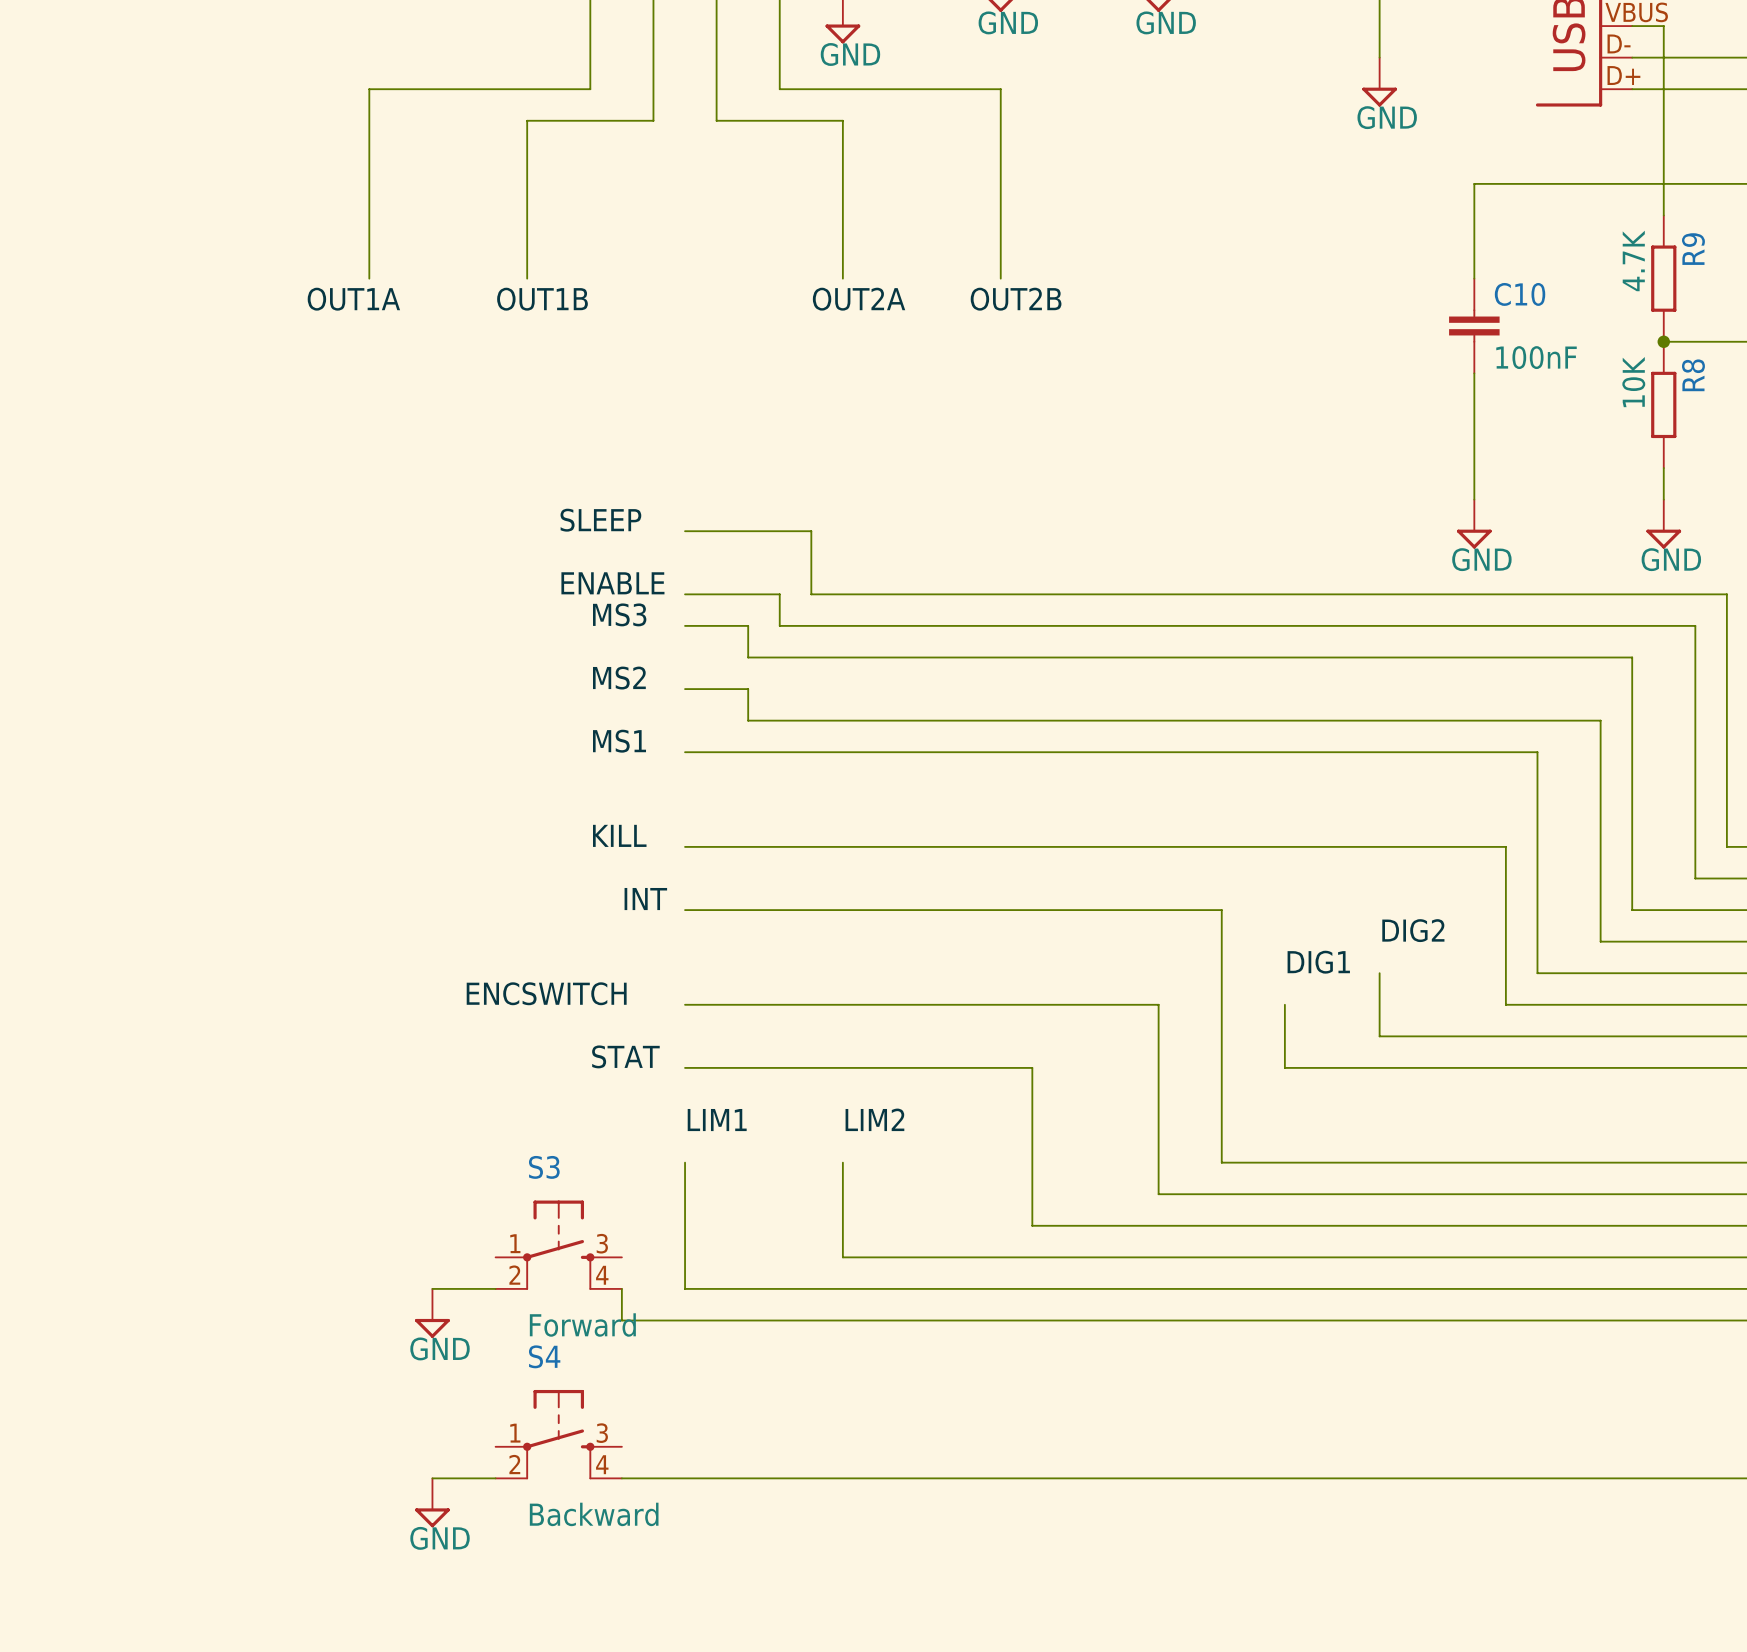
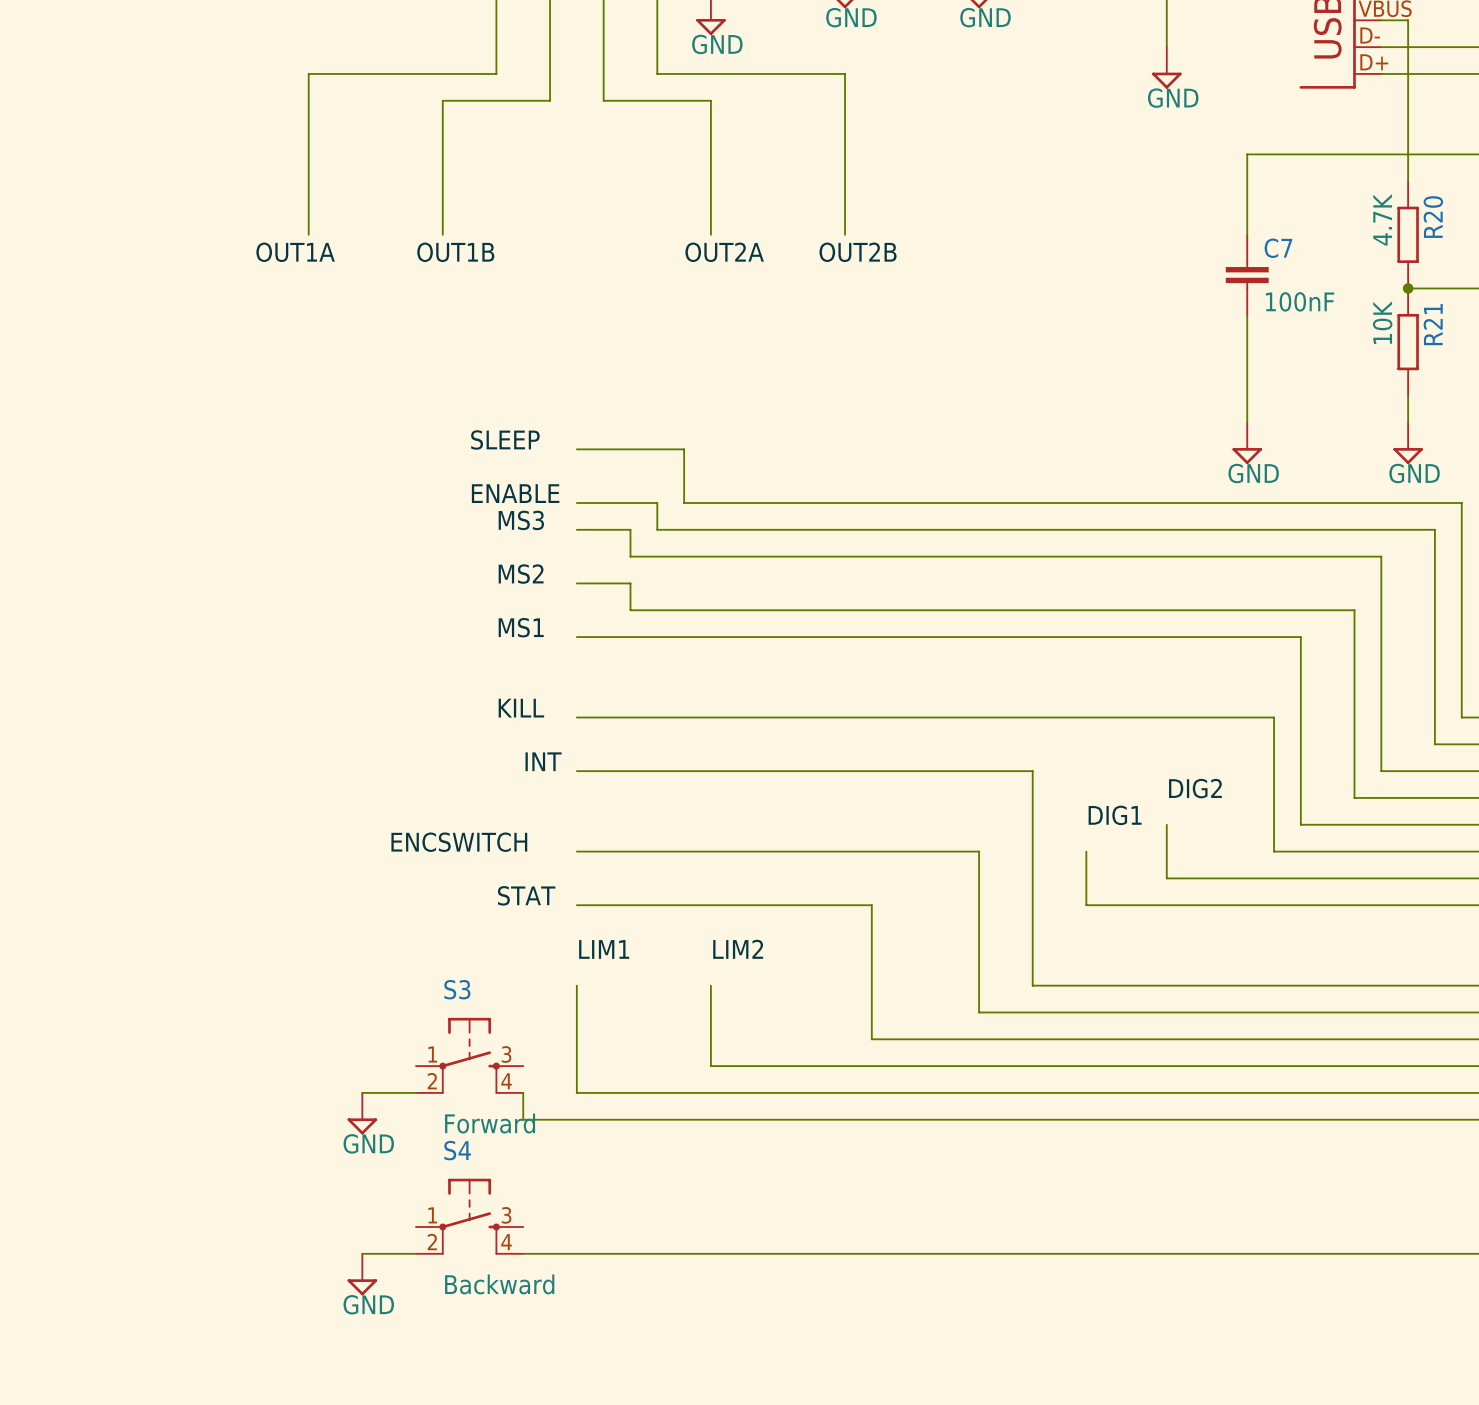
R9 name: R9 (1693, 249) -> R20 (1433, 217)
C10 name: C10 (1520, 294) -> C7 (1278, 248)
R8 name: R8 (1693, 375) -> R21 (1433, 324)

